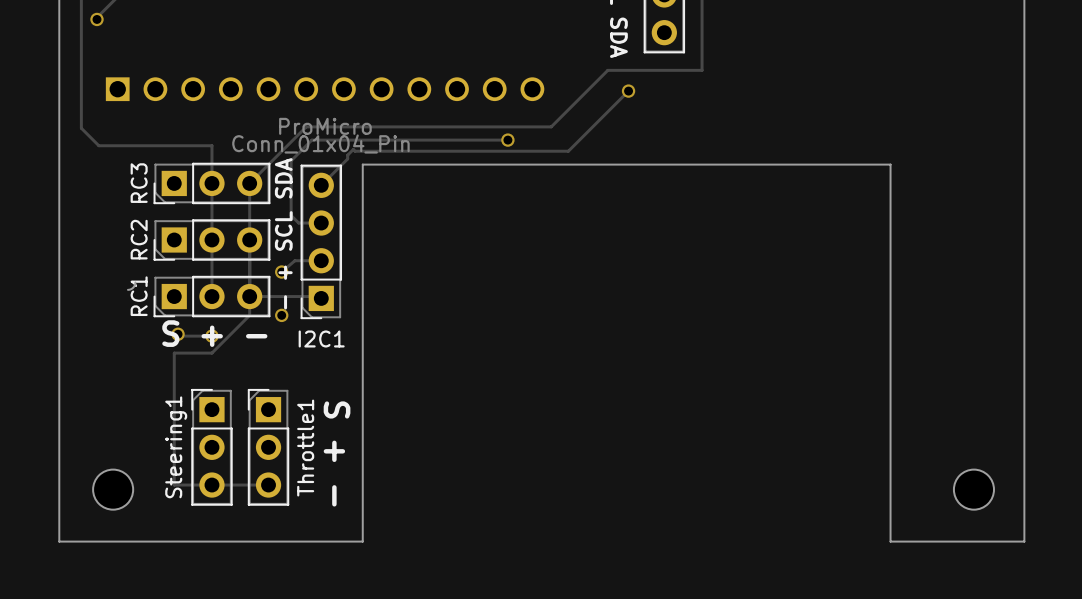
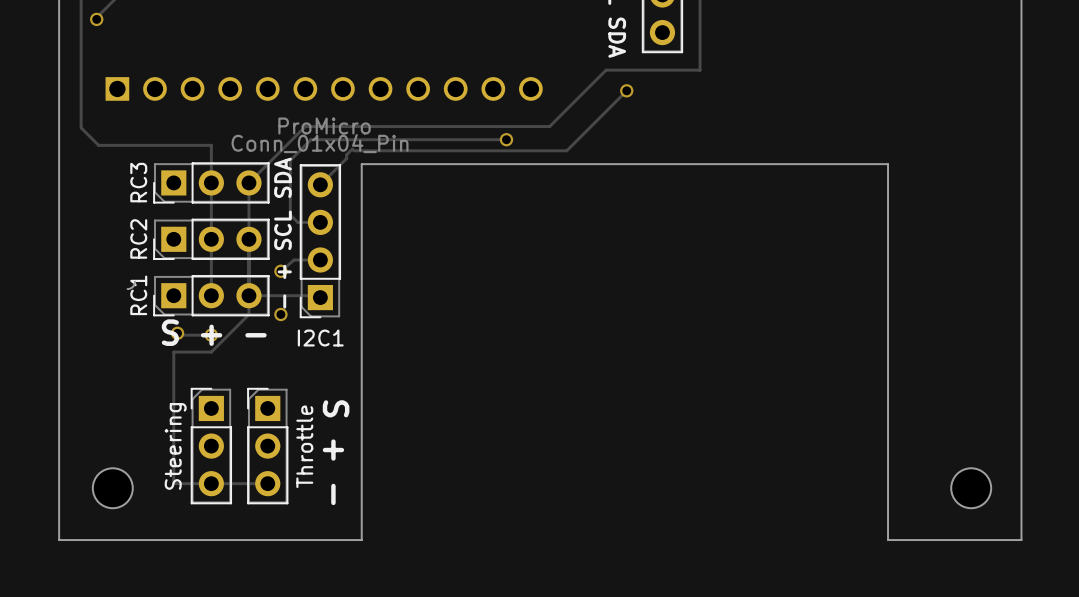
Steering1 name: Steering1 (176, 447) -> Steering (175, 446)
Throttle1 name: Throttle1 (305, 448) -> Throttle (304, 446)

